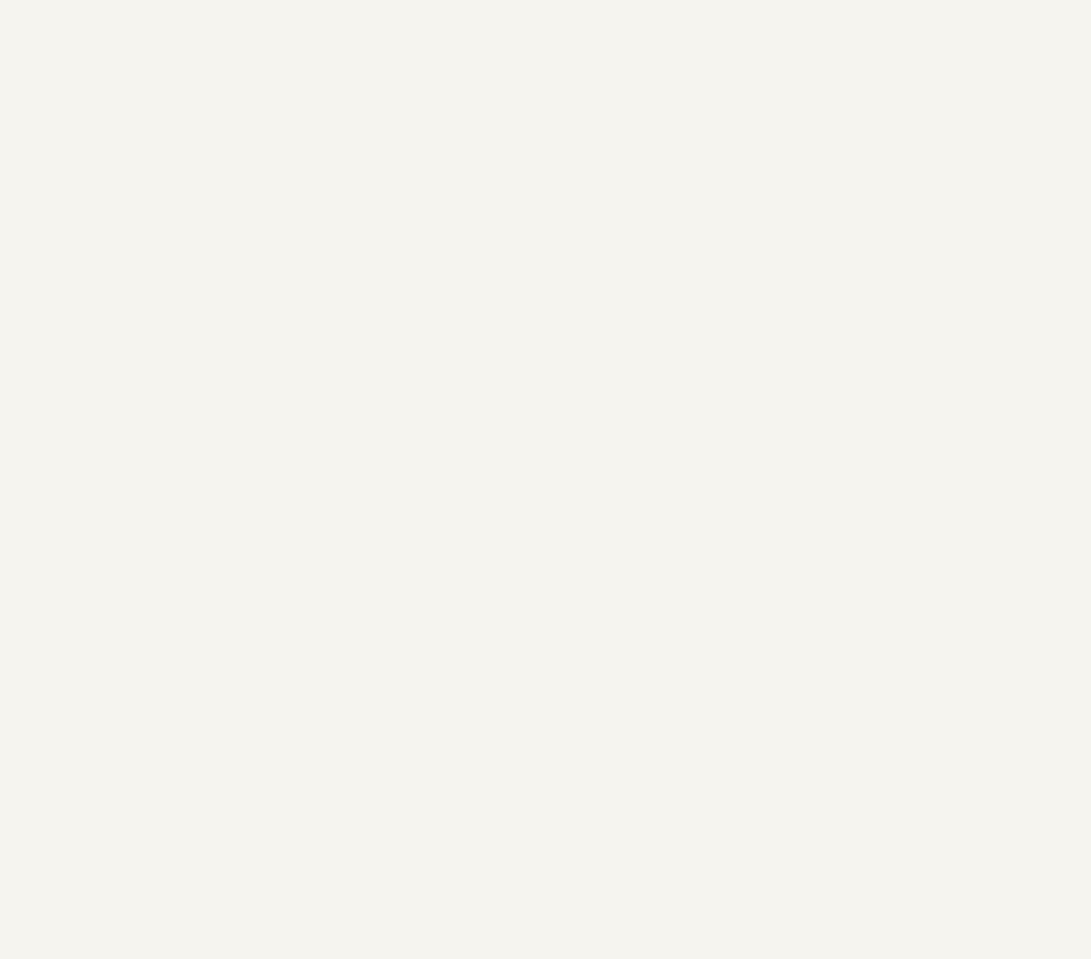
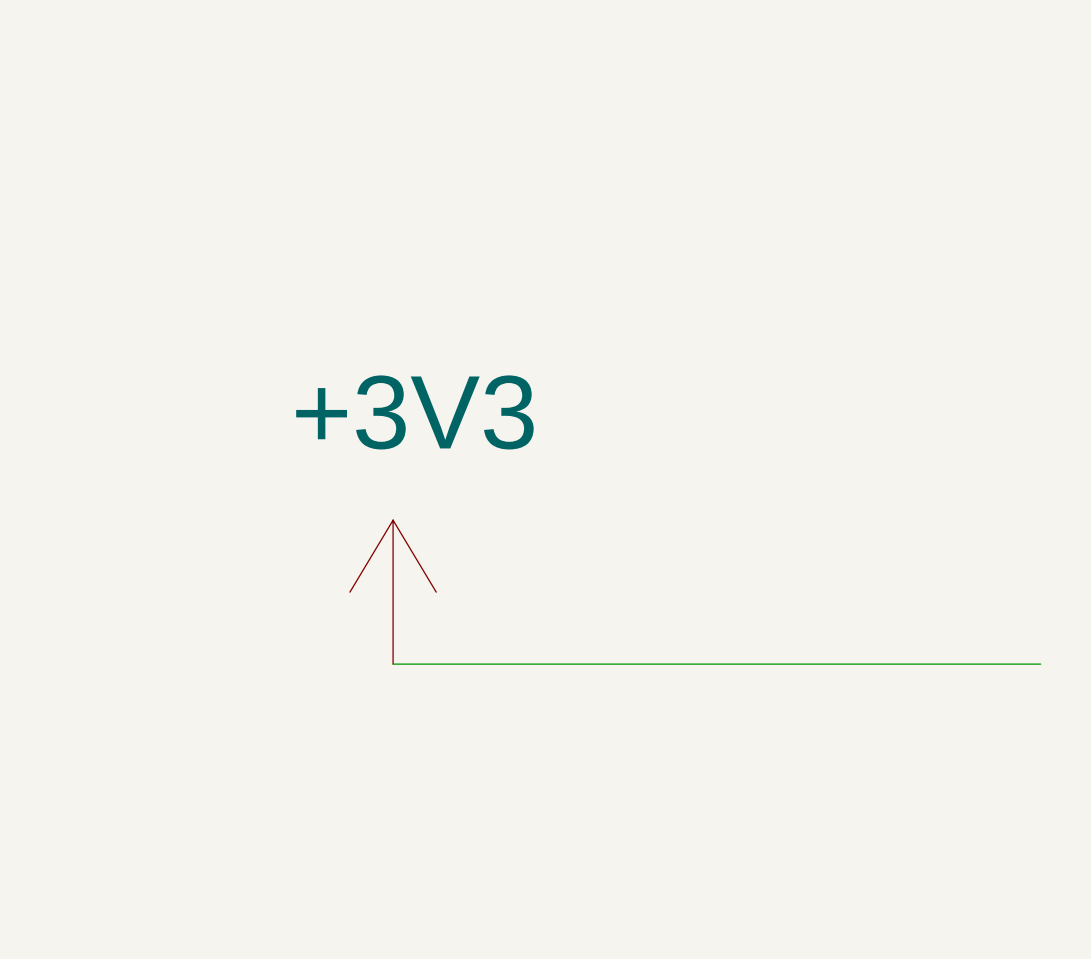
power symbol: none -> +3V3 (393, 592)
wire: none -> (393, 664) (1040, 664)

